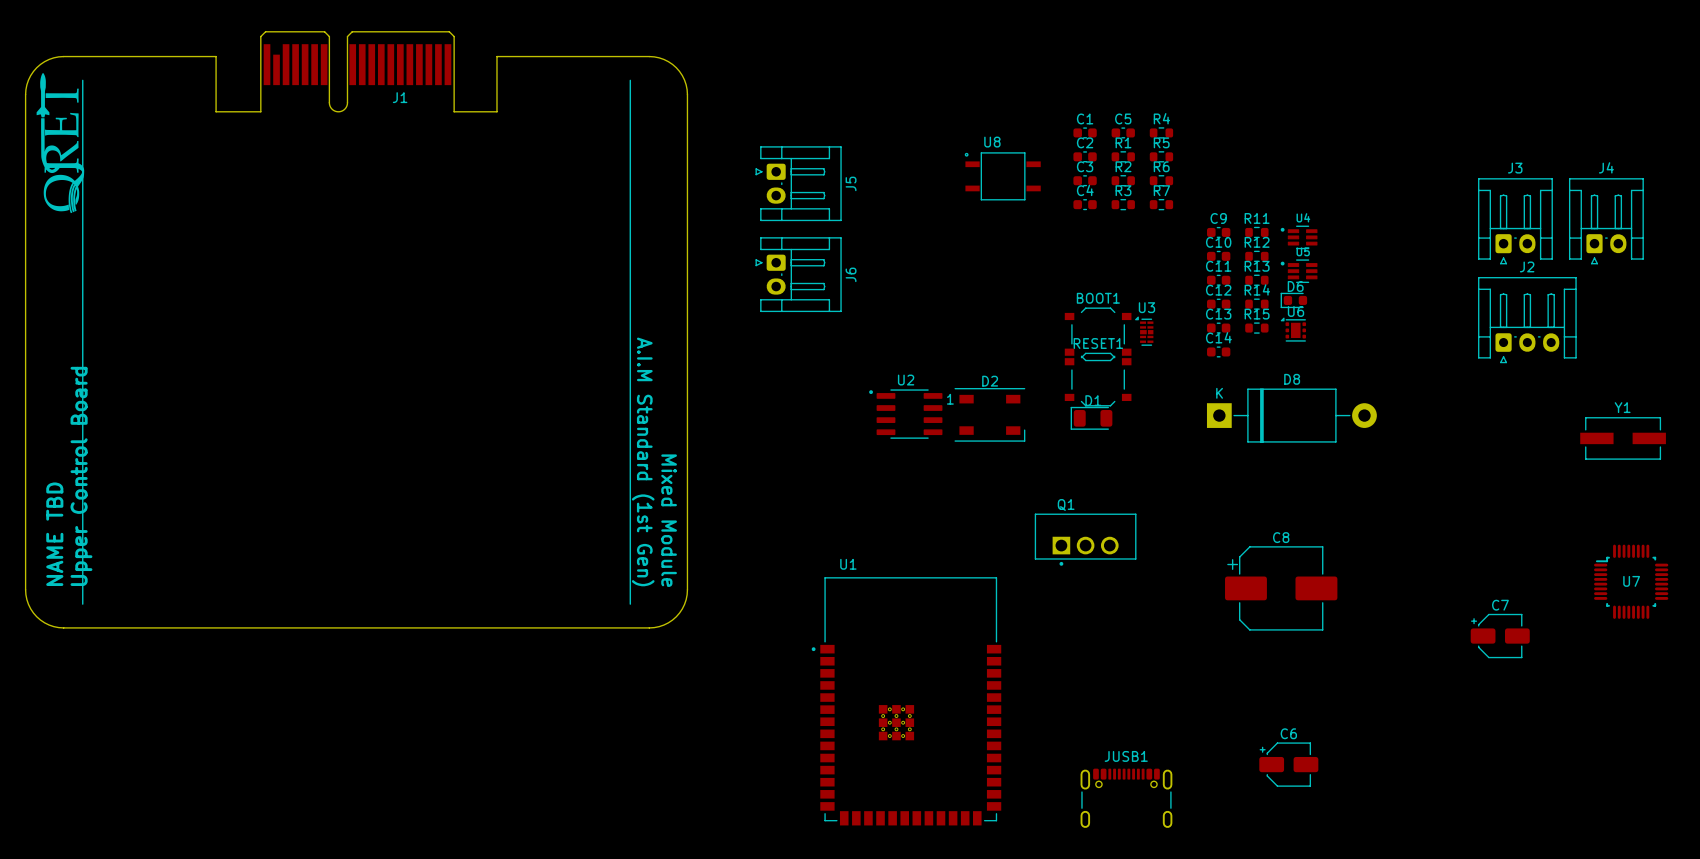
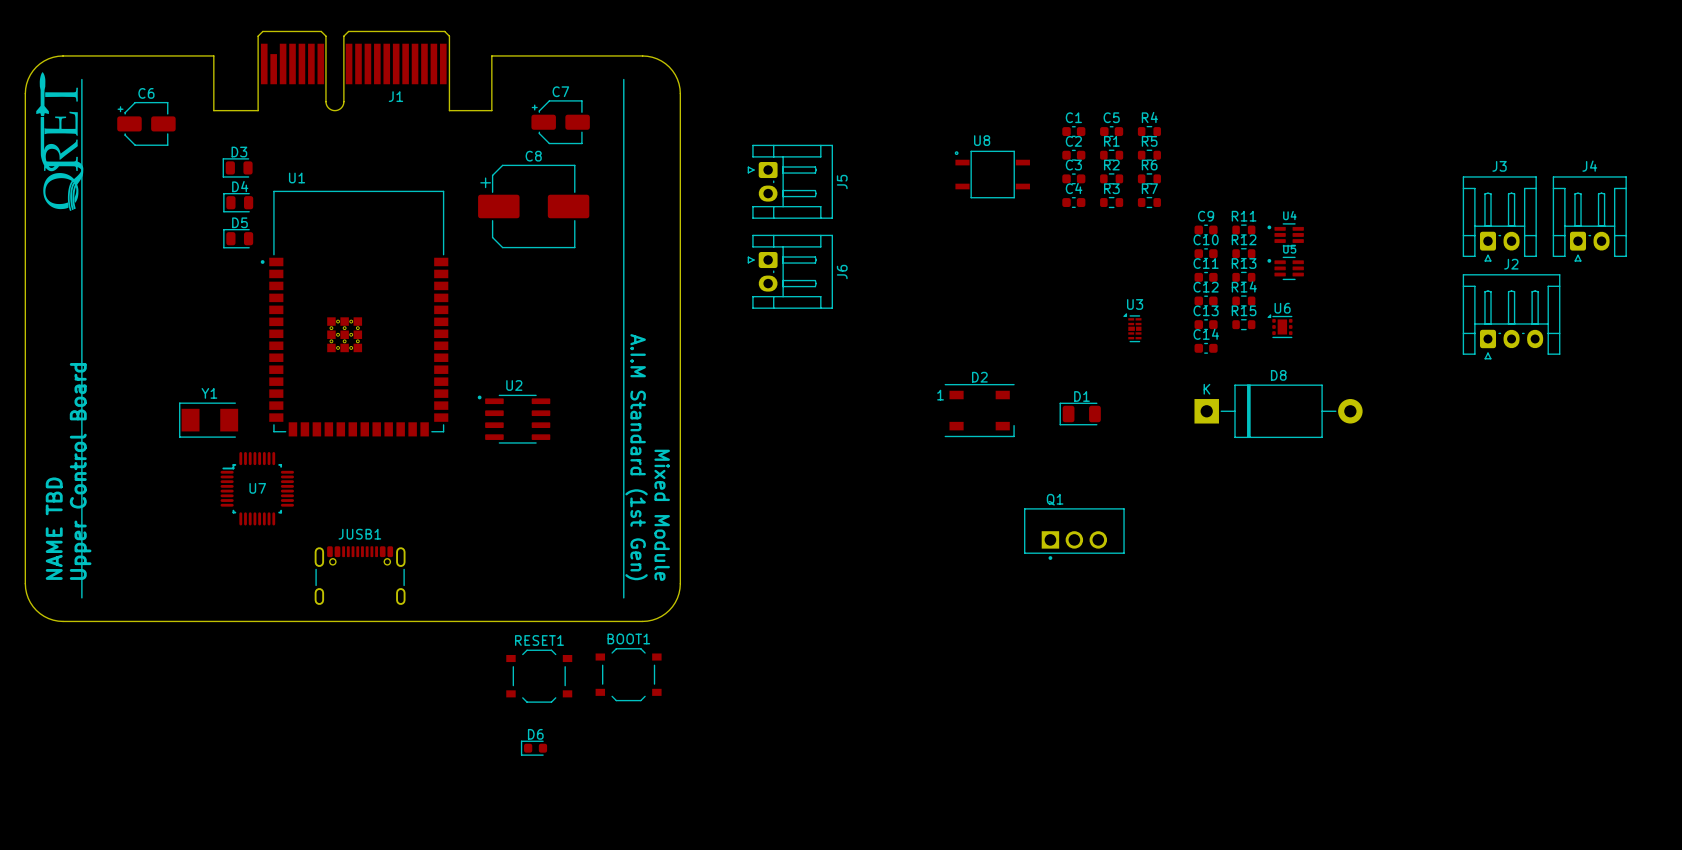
D3: none -> (237, 167)
D4: none -> (238, 202)
D5: none -> (238, 238)
D6 position: (1293, 300) -> (534, 748)
BOOT1 position: (1098, 334) -> (628, 674)
RESET1 position: (1098, 379) -> (539, 676)
U2 position: (905, 414) -> (514, 419)
Y1 footprint: [1580, 417, 1666, 460] -> [179, 402, 239, 438]
U7 position: (1631, 581) -> (257, 488)
C8 position: (1281, 588) -> (533, 206)
C7 position: (1500, 636) -> (560, 122)
U1 position: (906, 701) -> (354, 313)
C6 position: (1288, 764) -> (146, 123)
JUSB1 position: (1126, 798) -> (360, 575)

